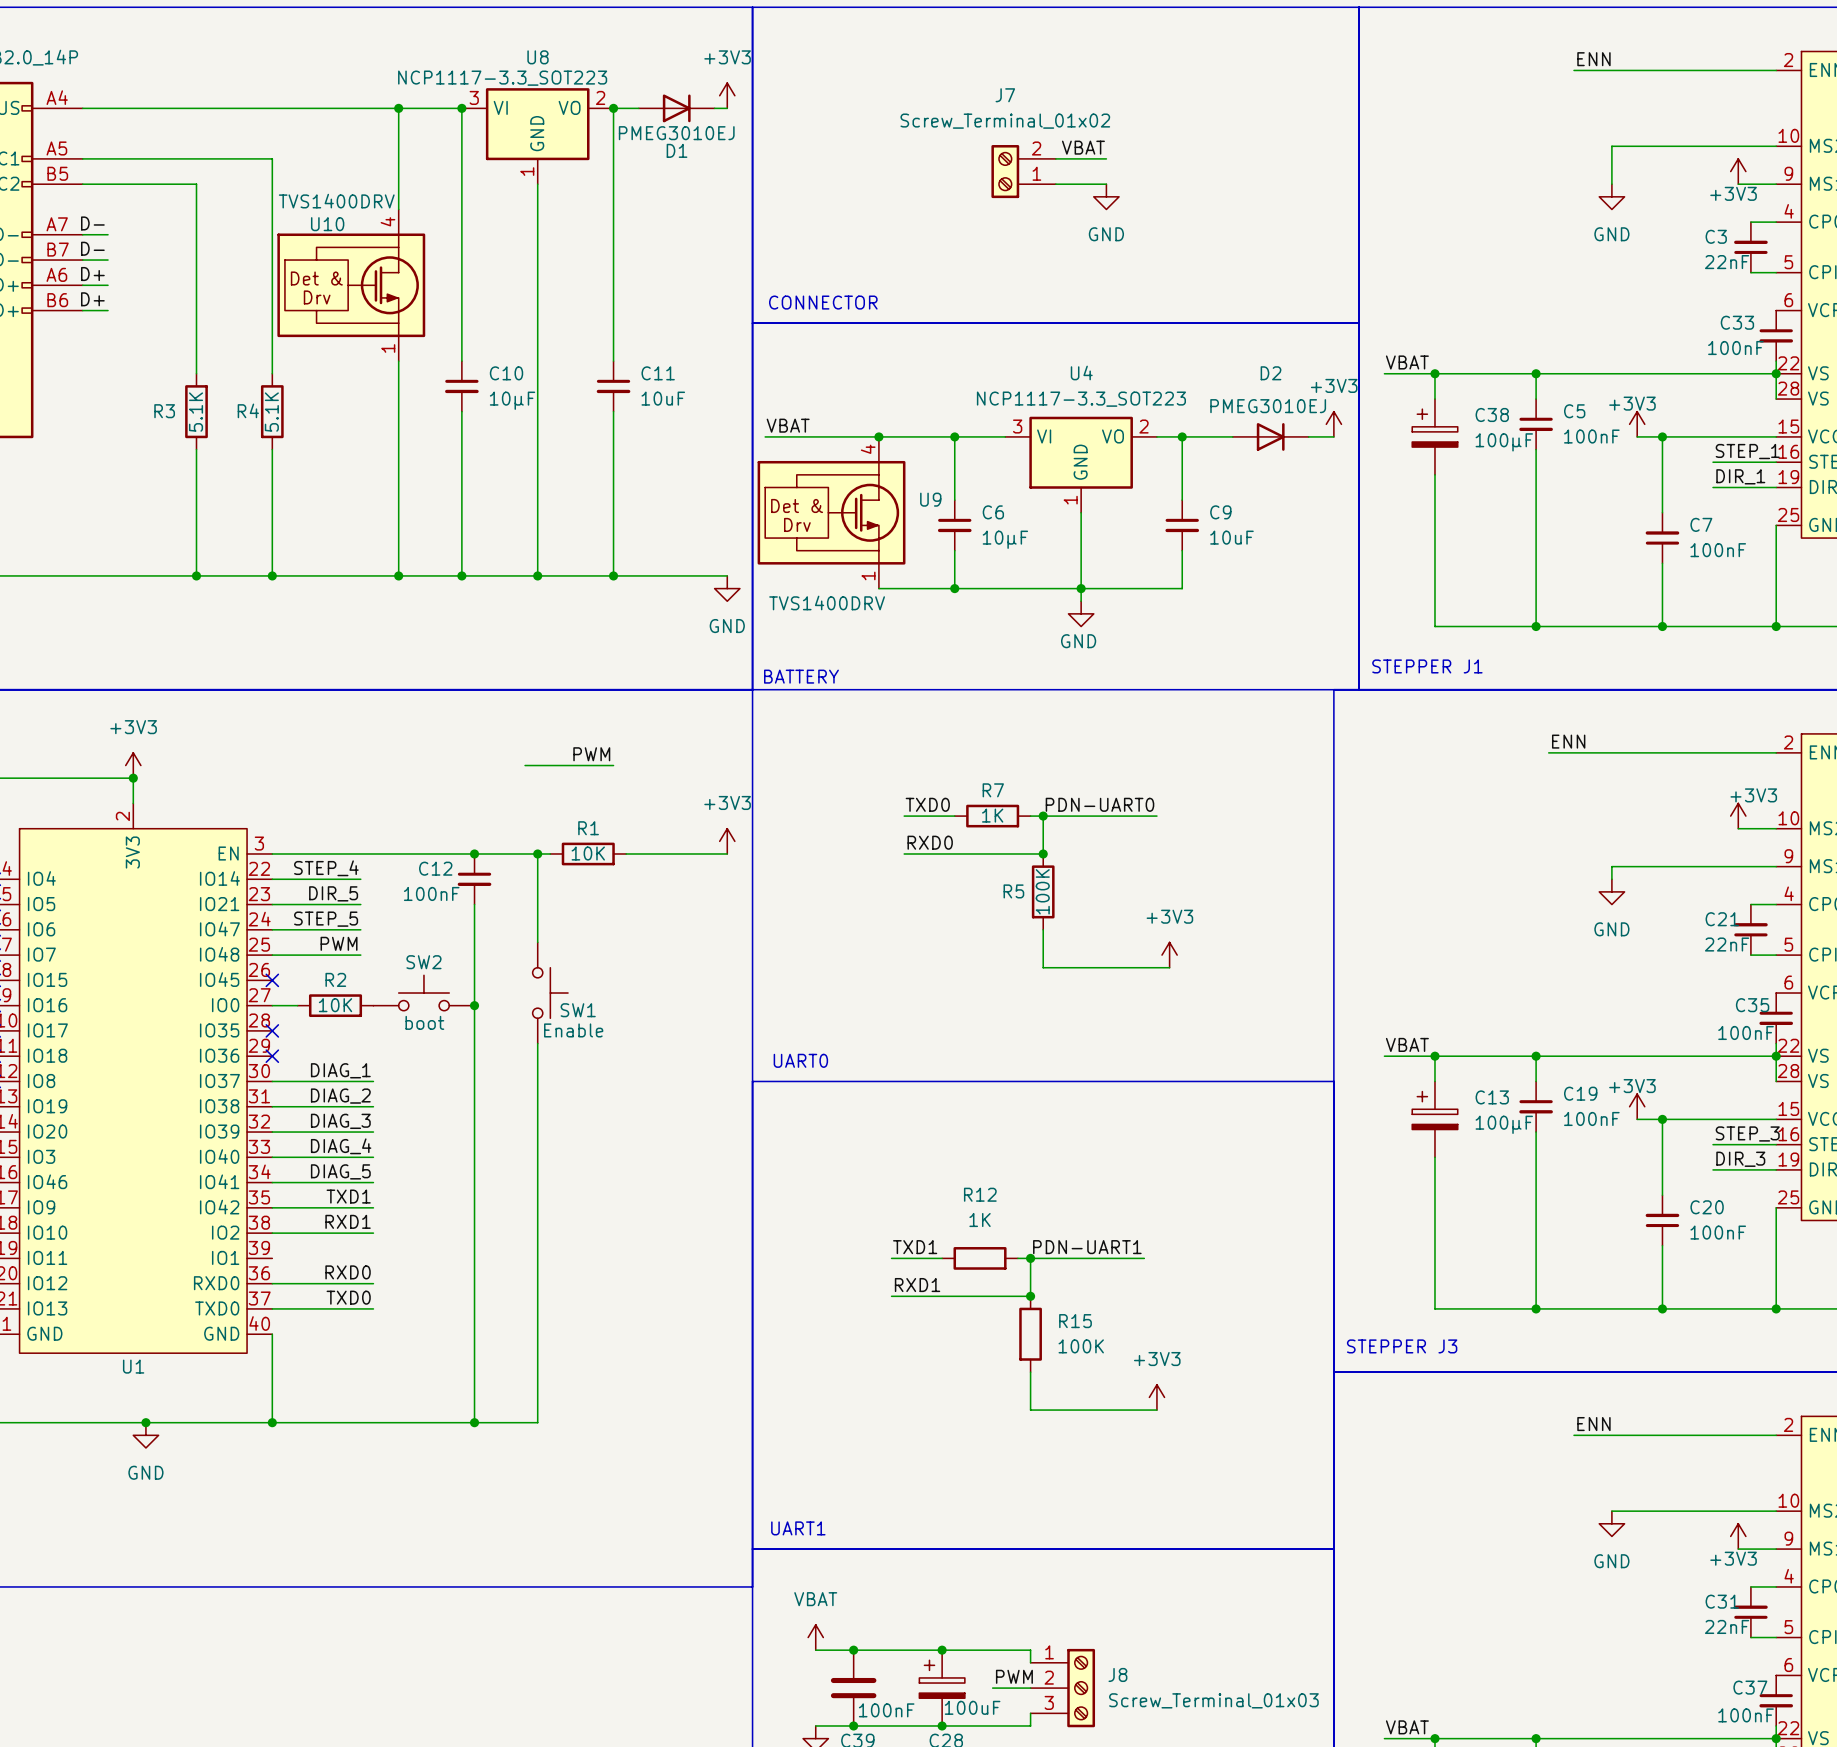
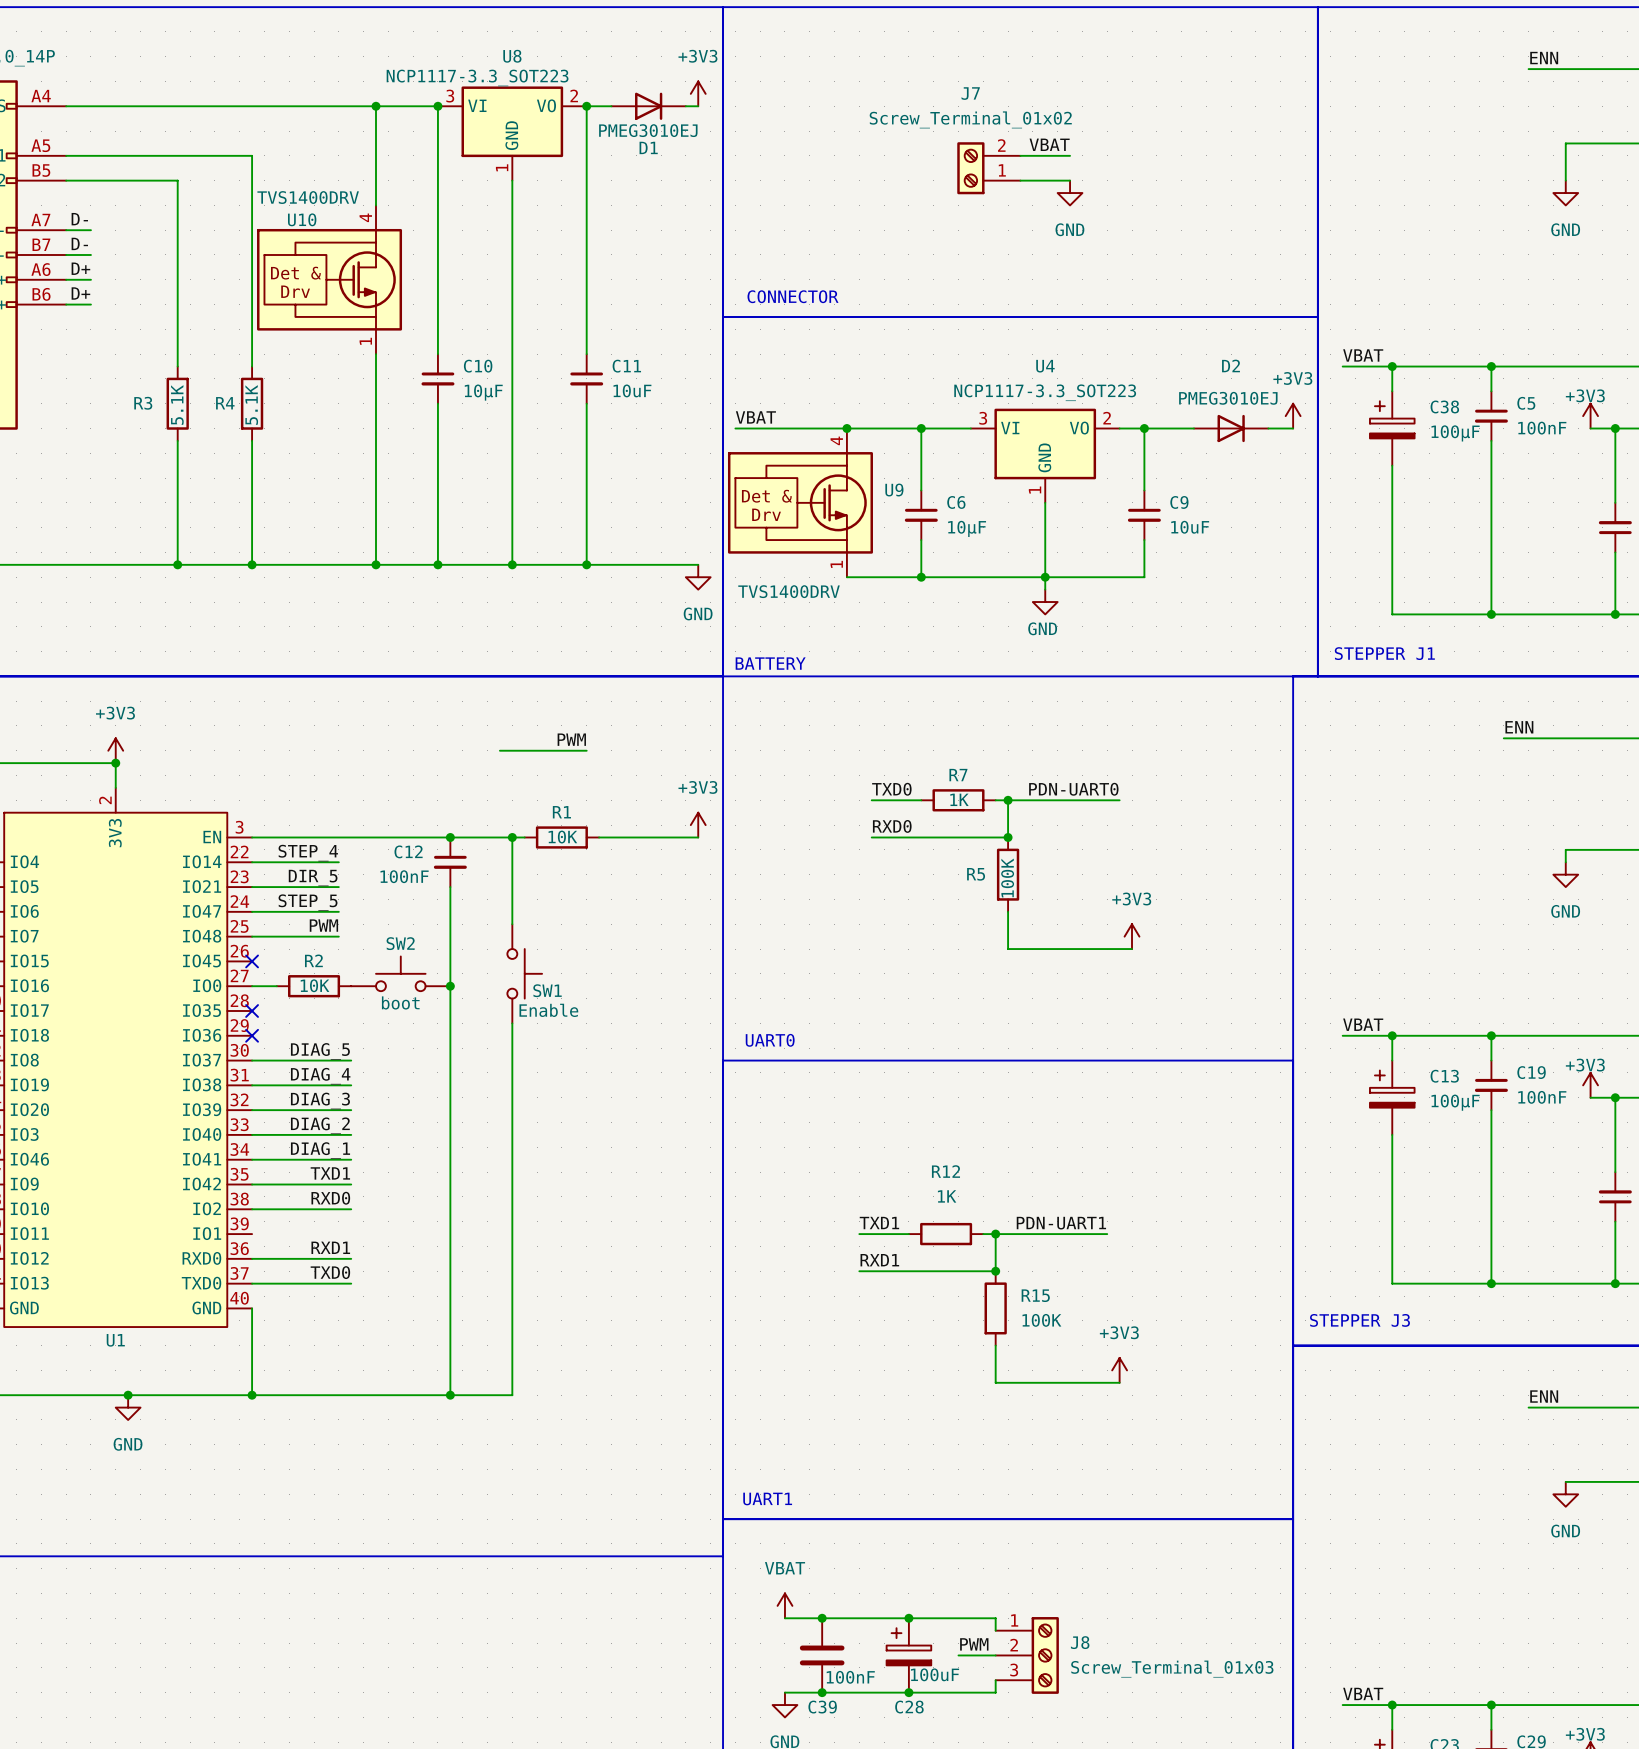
label: DIAG_1 (340, 1070) -> DIAG_5 (320, 1051)
label: DIAG_2 (340, 1096) -> DIAG_4 (320, 1076)
label: DIAG_4 (341, 1146) -> DIAG_2 (320, 1125)
label: DIAG_5 (340, 1171) -> DIAG_1 (320, 1150)
label: RXD1 (348, 1221) -> RXD0 (330, 1198)
label: RXD0 (348, 1272) -> RXD1 (330, 1247)

